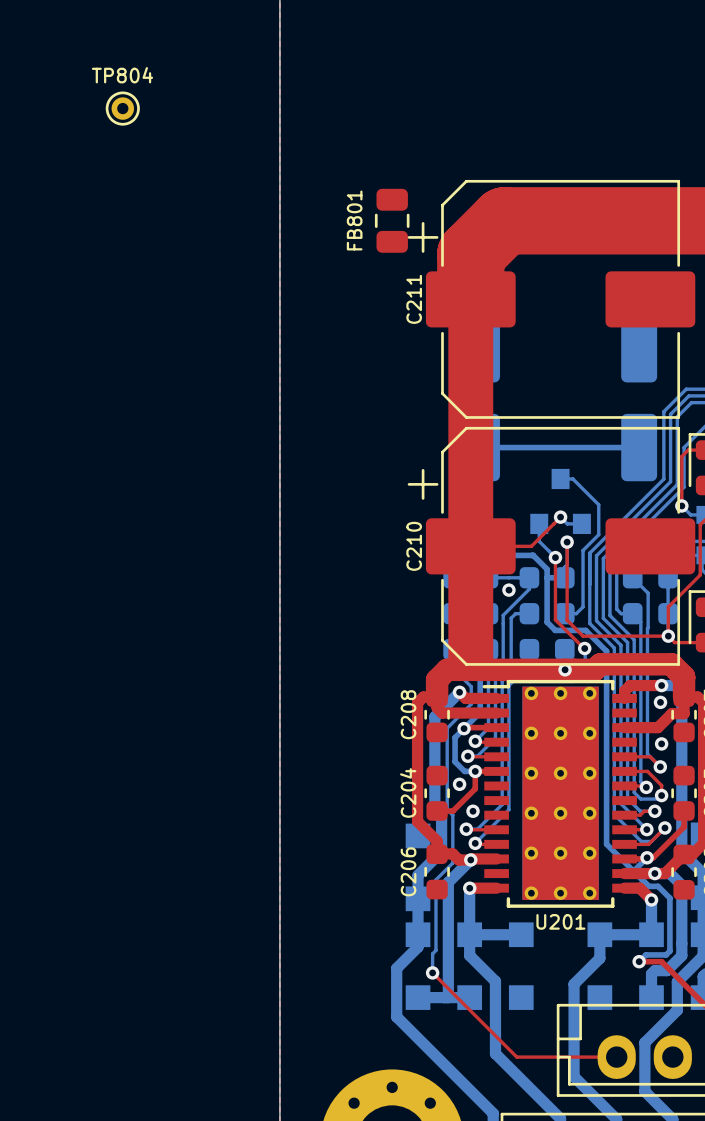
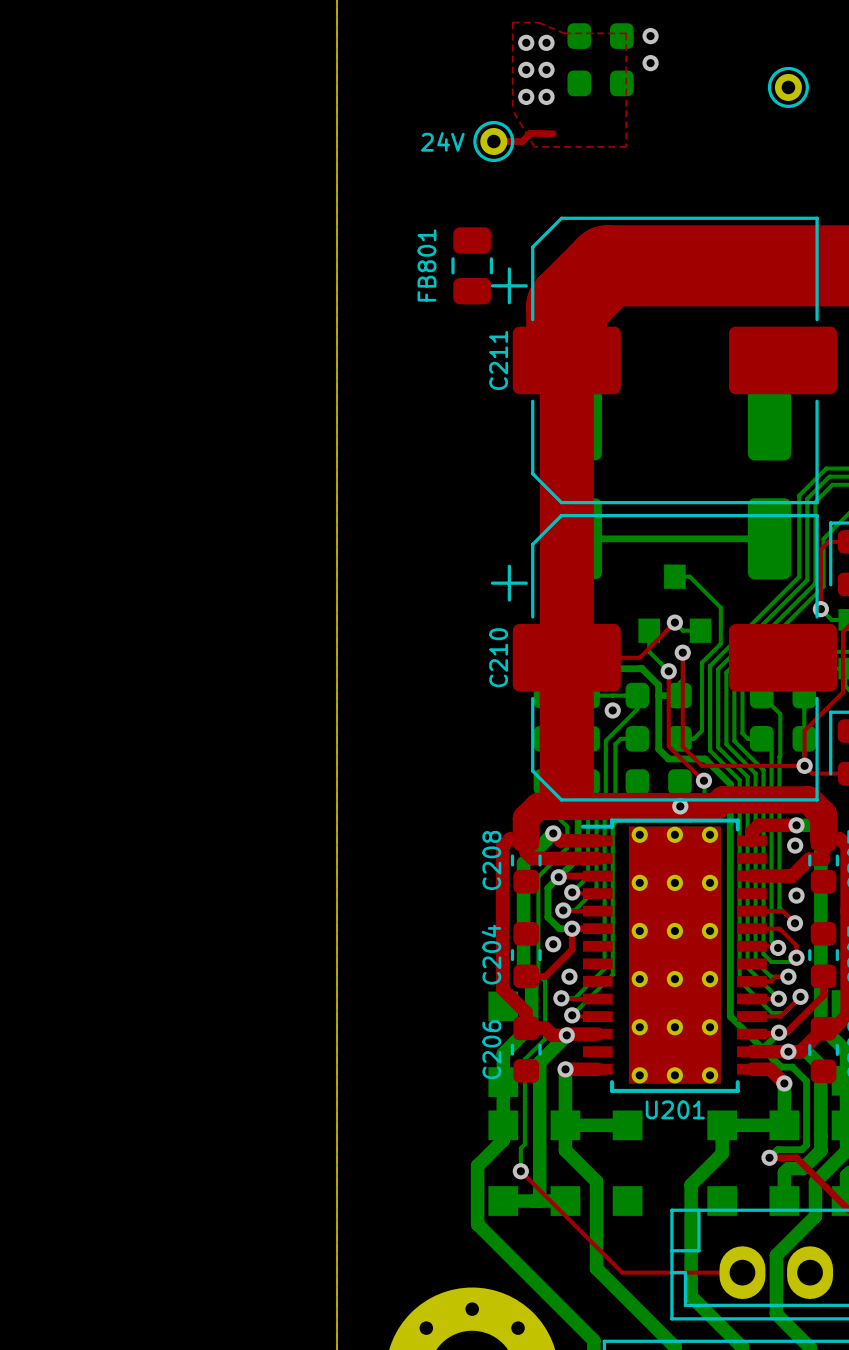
top zone outline: none -> (512, 22) (512, 110) (534, 146) (626, 146) (626, 33) (564, 33) (538, 22) (512, 22)
part: none -> (600, 36)
via: none -> (650, 36)
via: none -> (526, 42)
via: none -> (546, 42)
via: none -> (650, 63)
via: none -> (526, 69)
via: none -> (546, 69)
part: none -> (600, 83)
part: none -> (788, 87)
via: none -> (526, 96)
via: none -> (546, 96)
TP804: (122, 108) -> none
top track: none -> (553, 133) (530, 133) (522, 141) (493, 141)
text: none -> 24V (442, 141)
part: none -> (493, 141)

